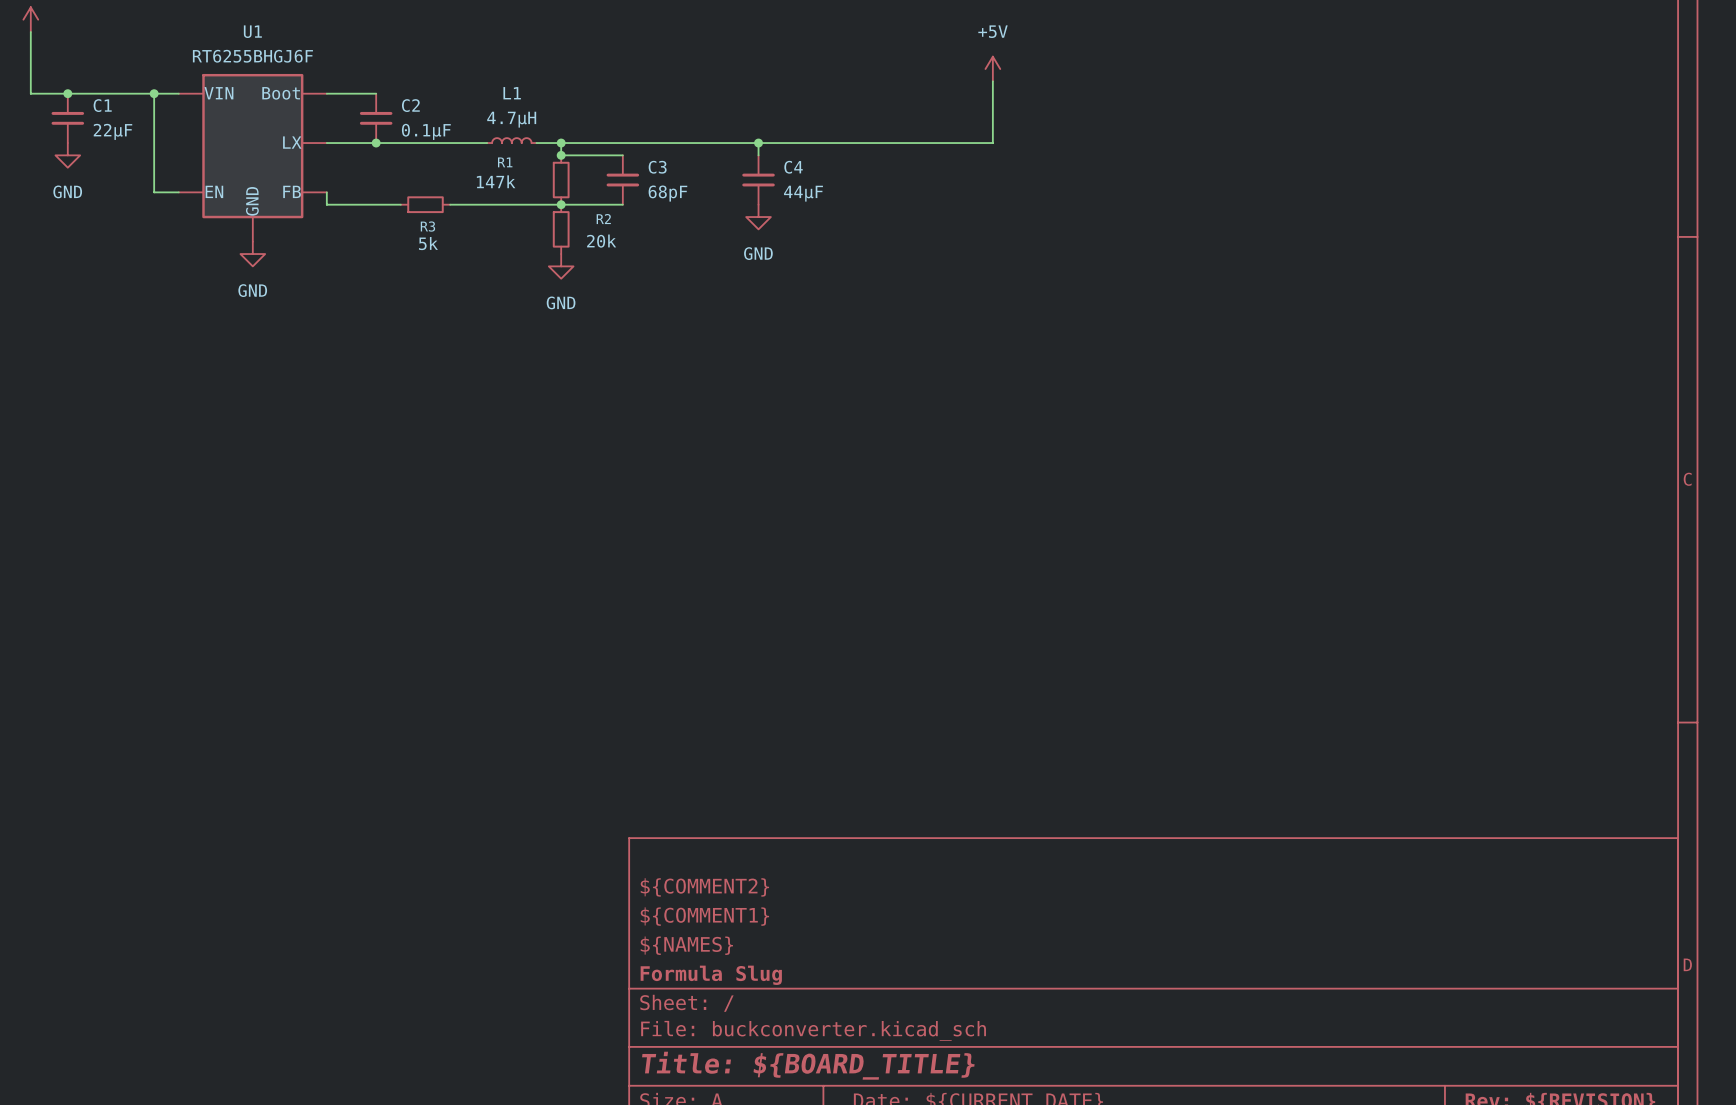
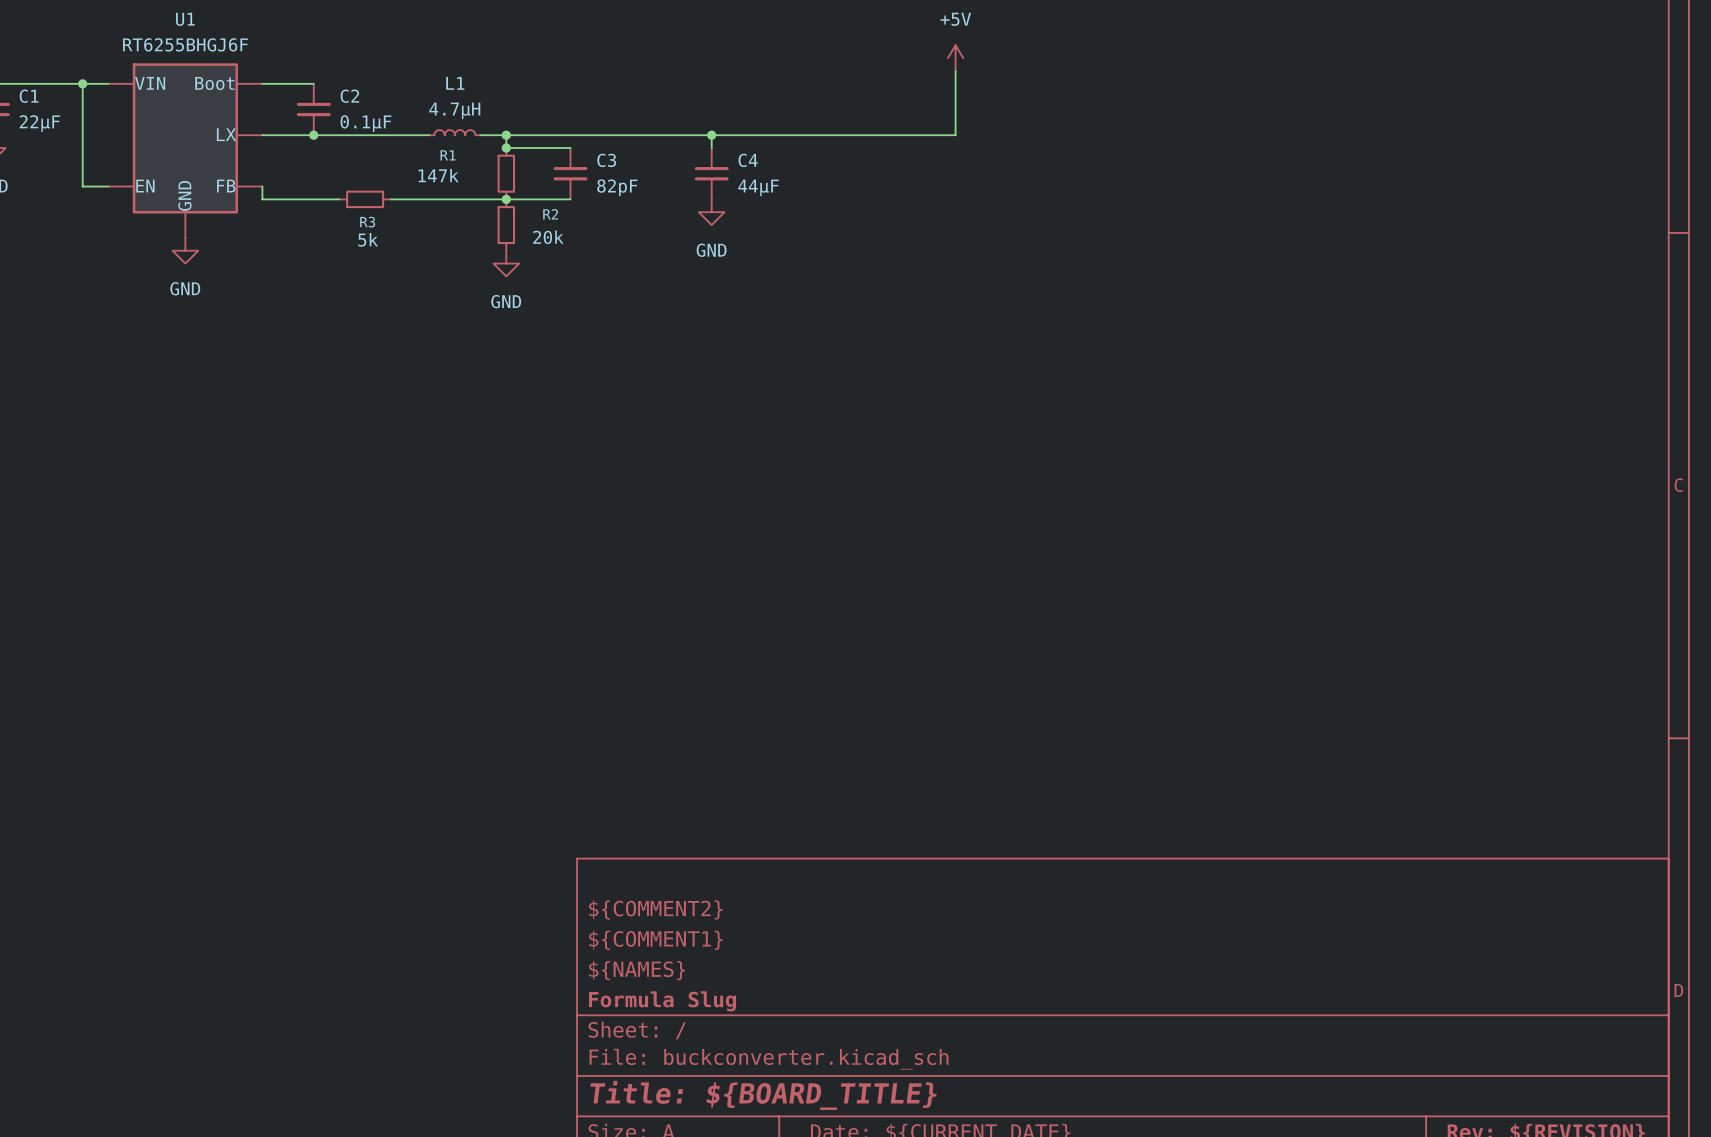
C3 value: 68pF (667, 193) -> 82pF (617, 187)

